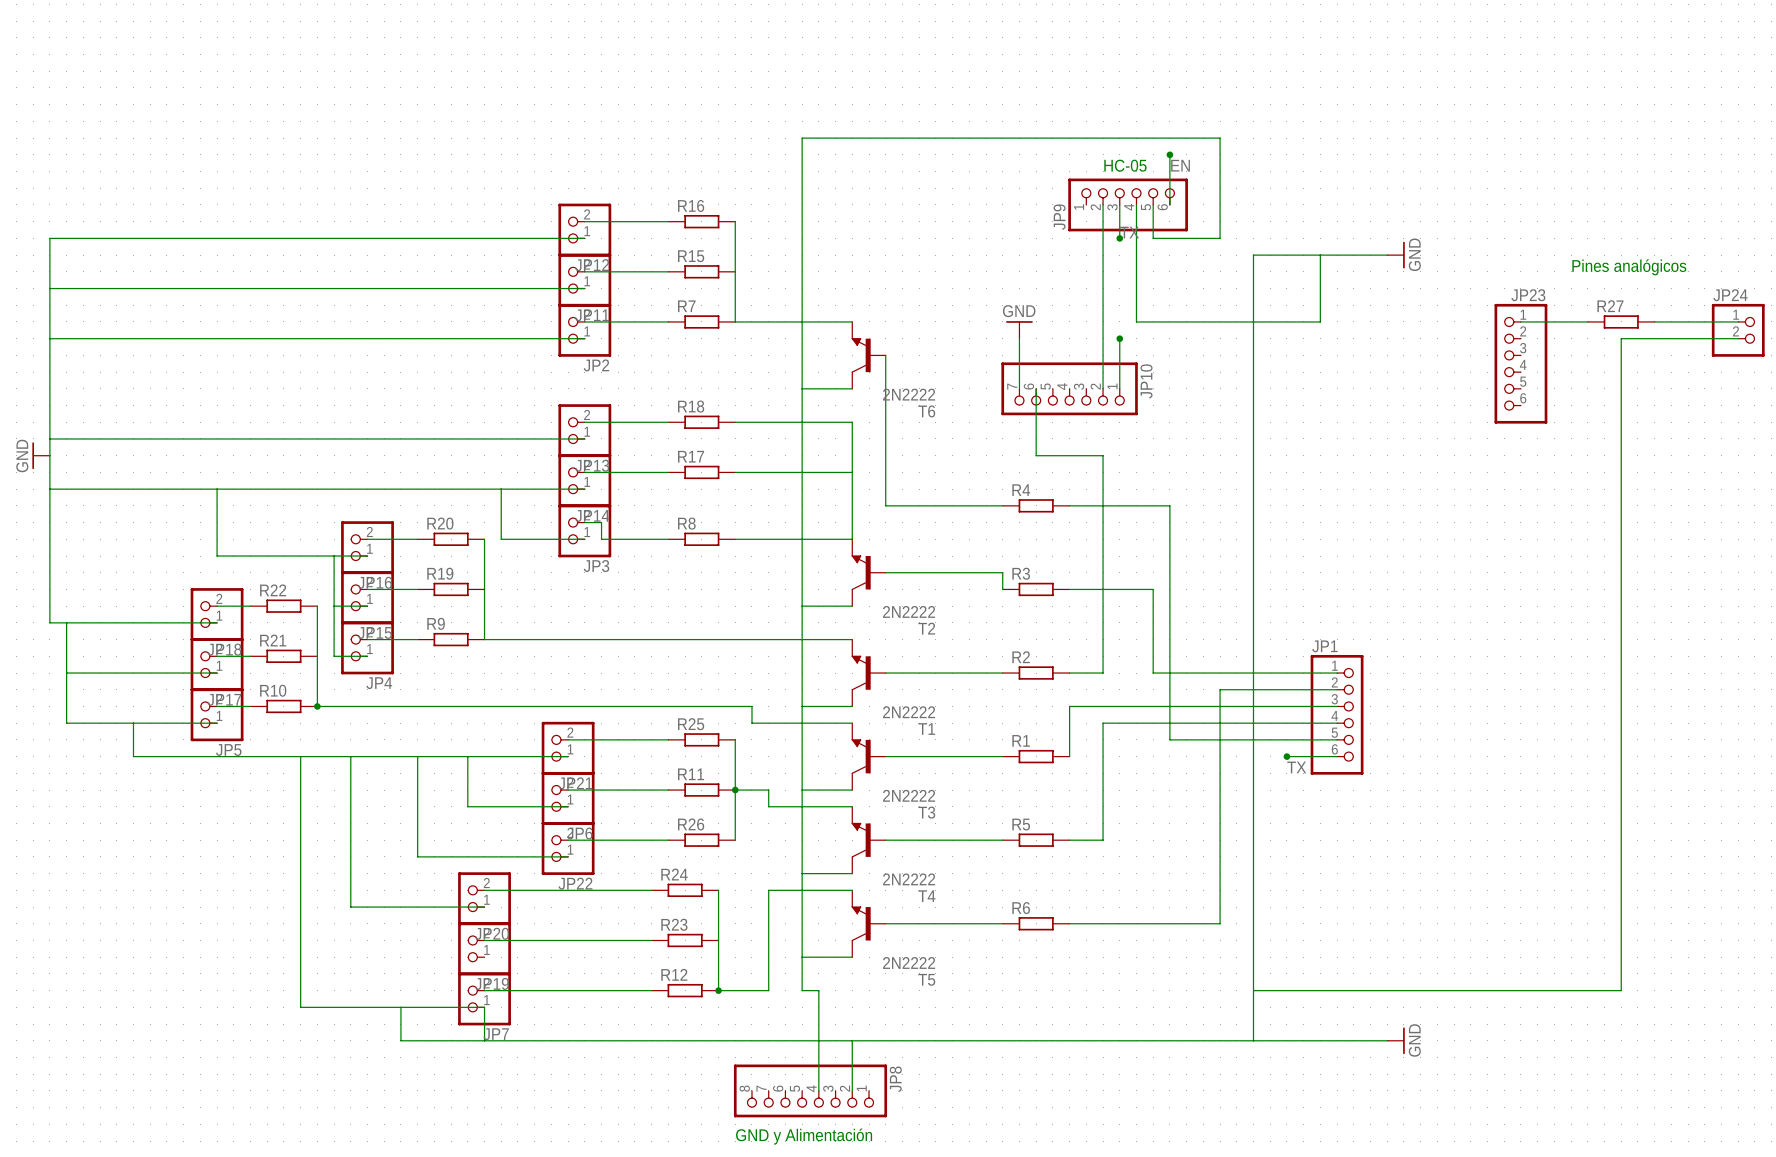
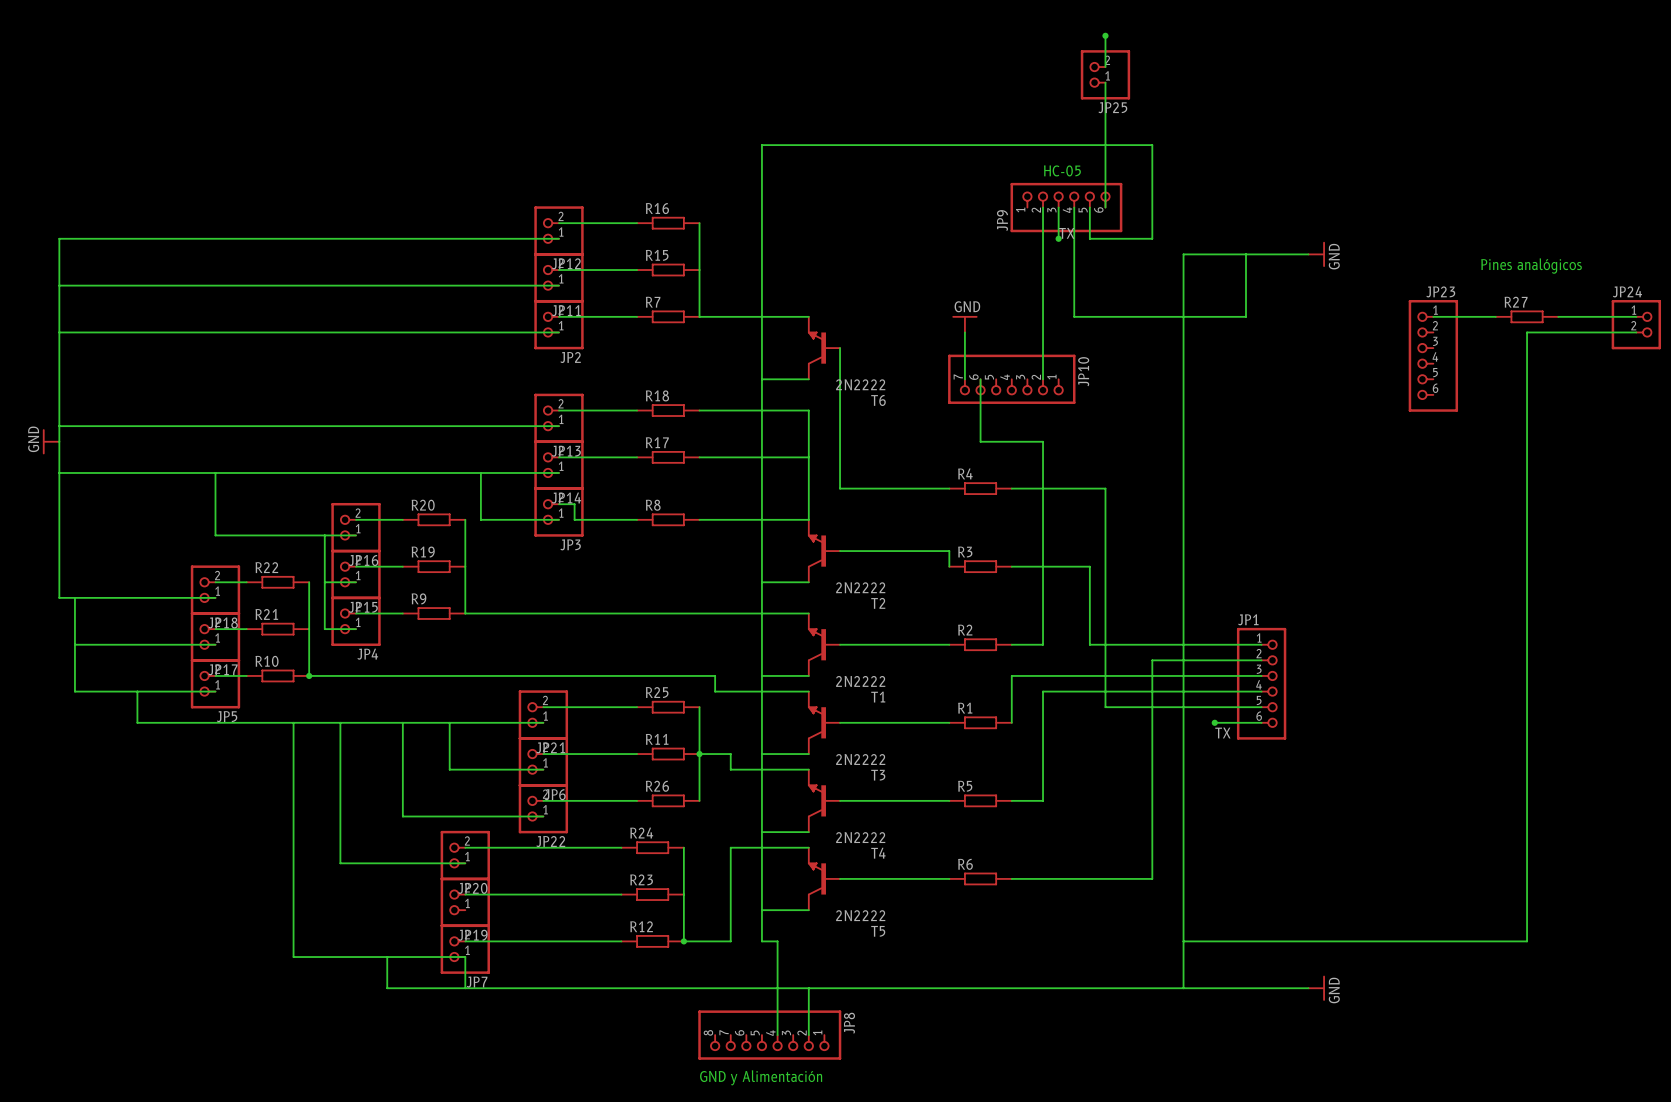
wire: none -> (1105, 35) (1105, 67)
junction: none -> (1105, 35)
JP25: none -> (1105, 74)
wire: none -> (1105, 82) (1105, 160)
junction: (1169, 154) -> none
label: EN (1180, 165) -> none
wire: (1119, 338) (1119, 388) -> none
junction: (1119, 338) -> none

